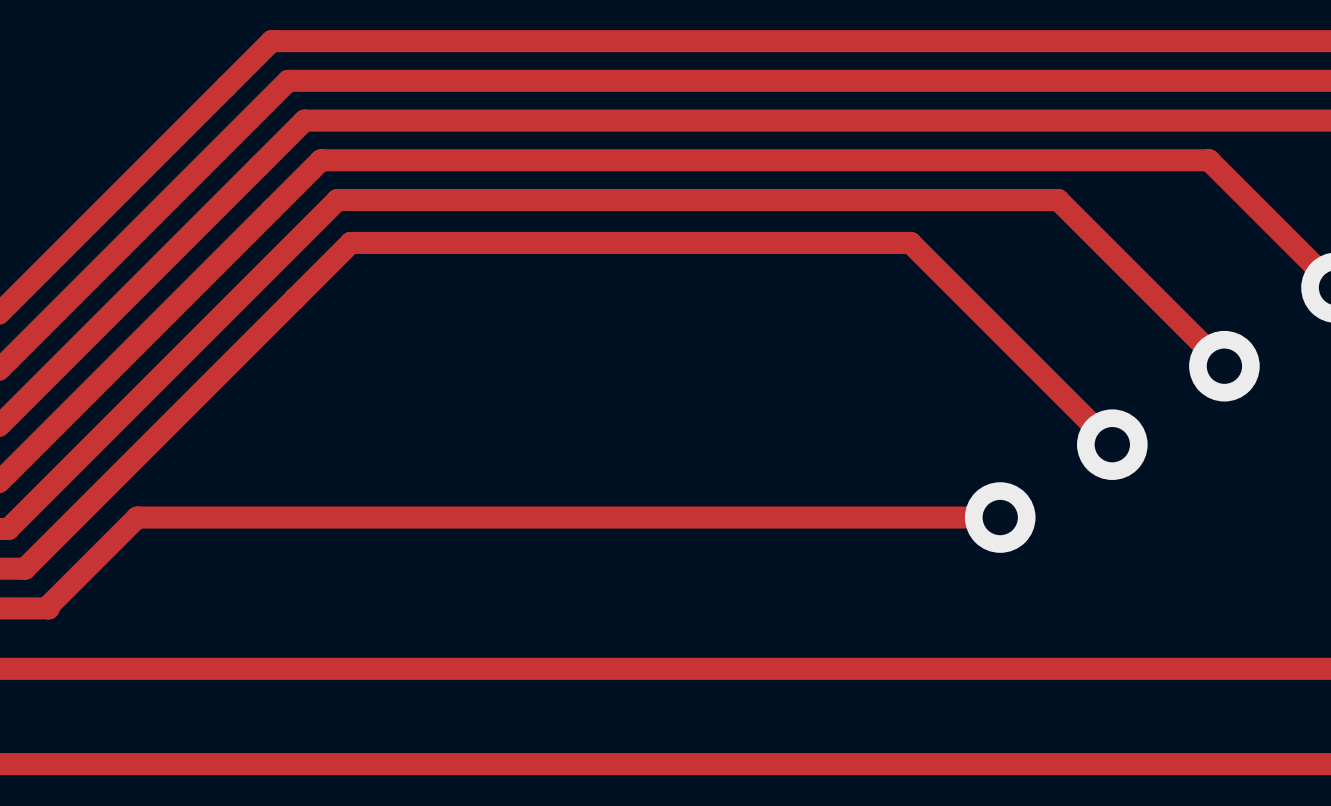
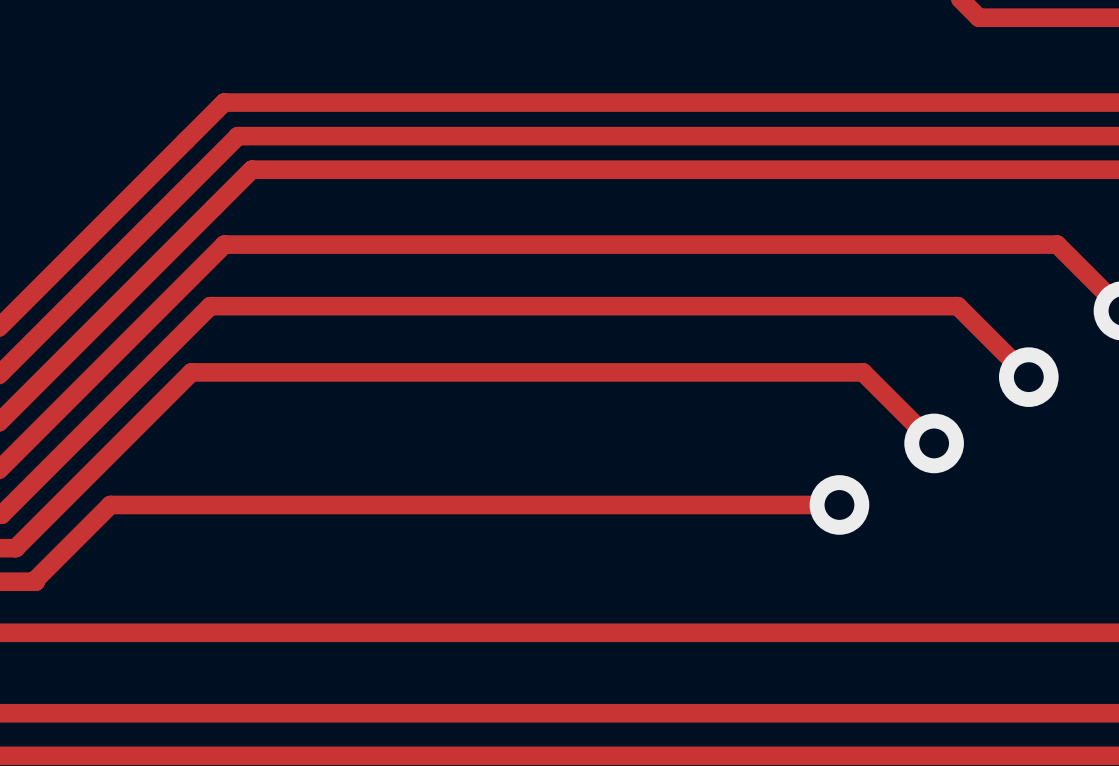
track: (272, 209) (320, 160) (1209, 160) (1258, 209) -> (224, 244) (1057, 244)
track: (255, 282) (337, 200) (1058, 200) (1140, 282) -> (210, 306) (957, 306)
track: (233, 360) (350, 242) (910, 242) (1028, 360) -> (191, 372) (863, 372)

